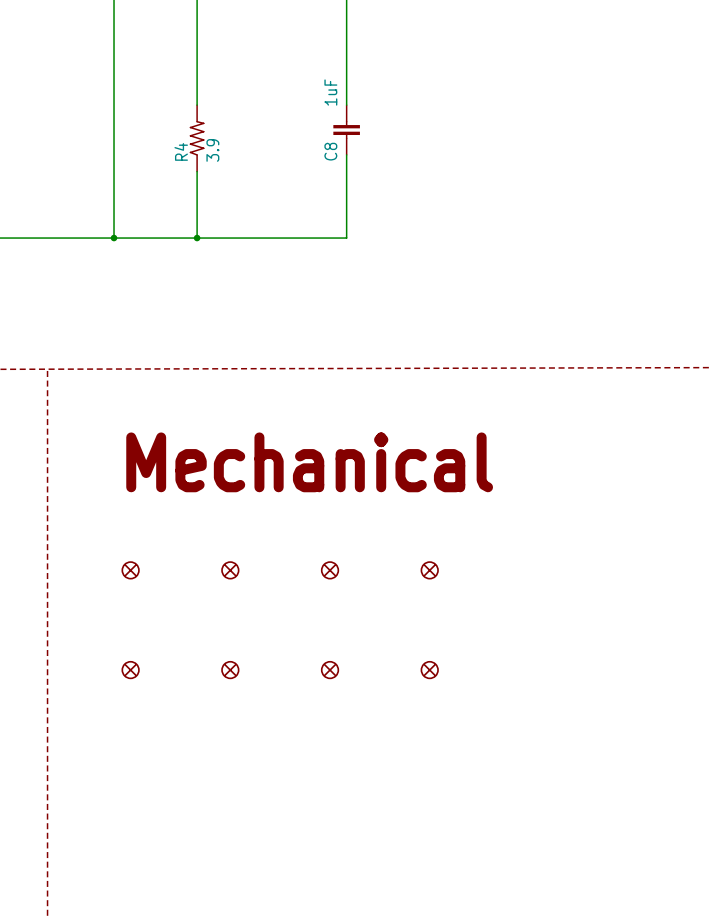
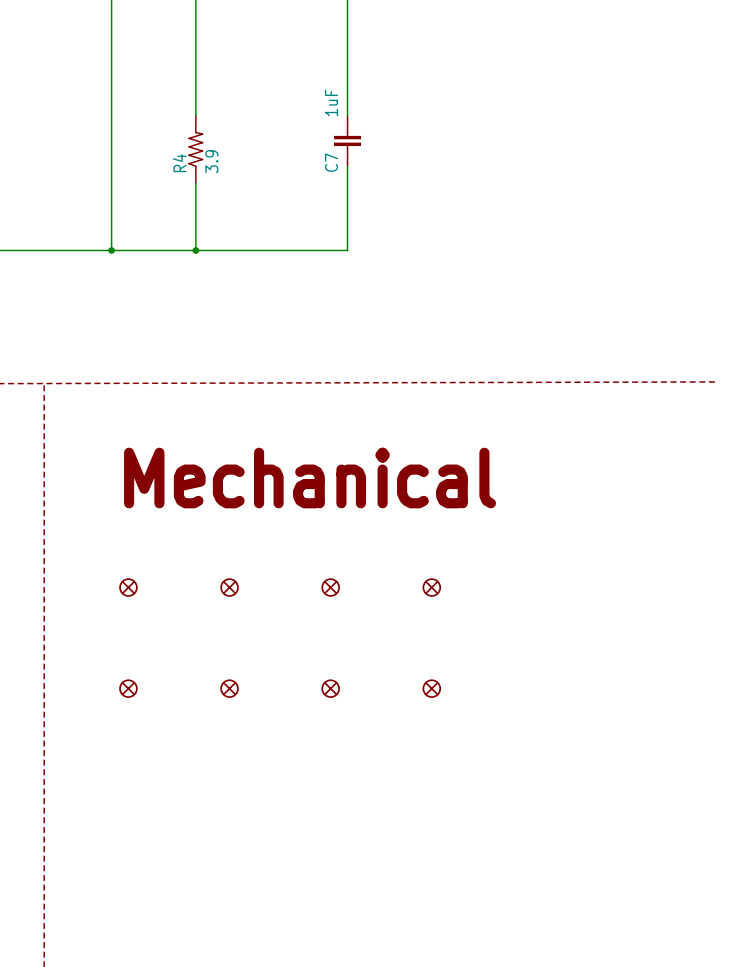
C8 name: C8 (330, 151) -> C7 (331, 162)

